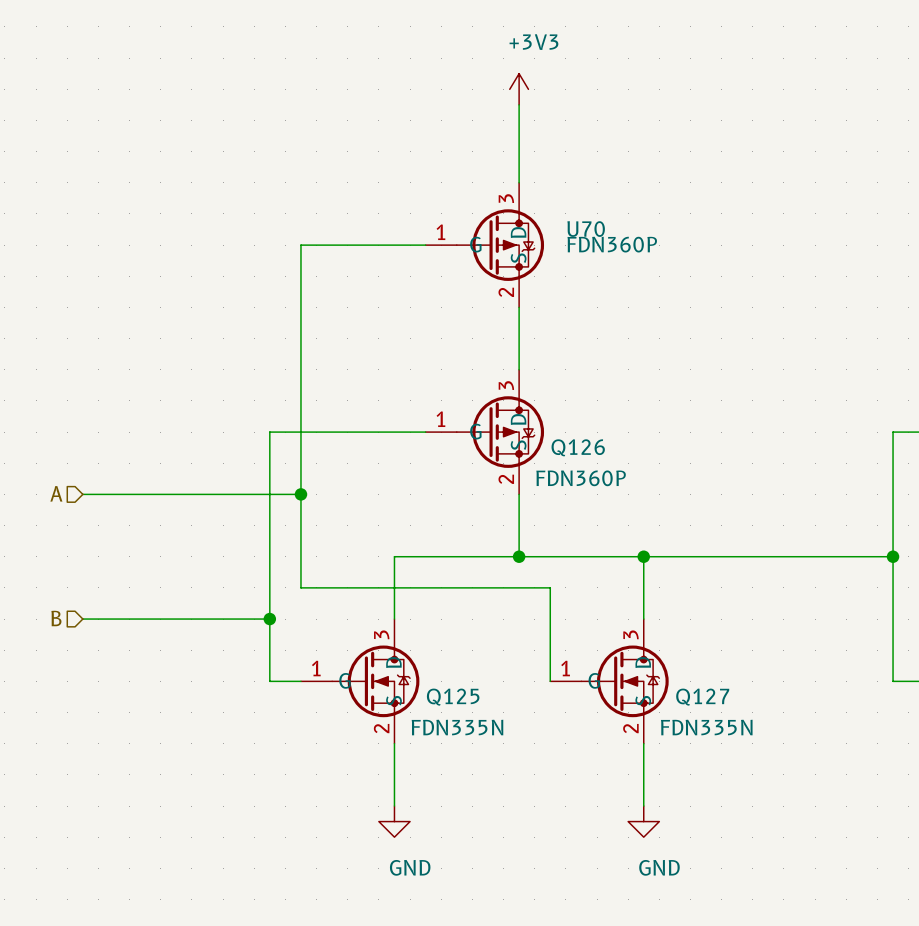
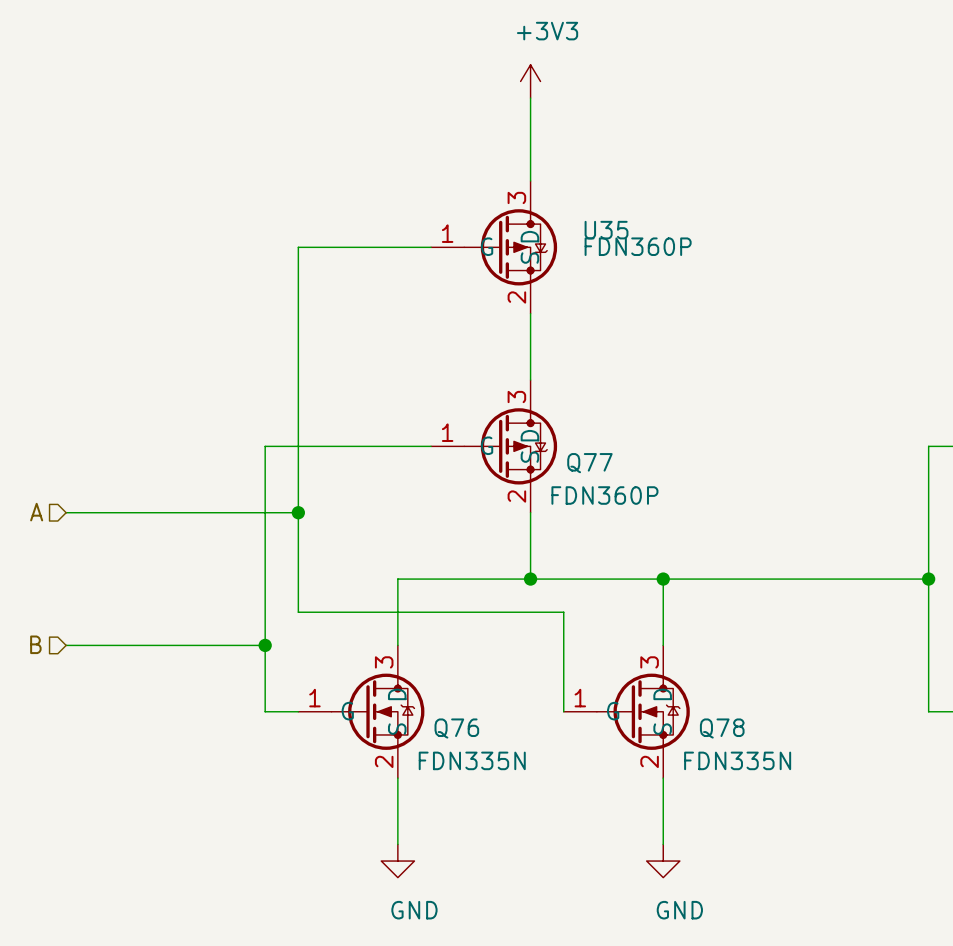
U70 name: U70 (586, 229) -> U35 (606, 230)
Q126 name: Q126 (578, 447) -> Q77 (589, 463)
Q125 name: Q125 (453, 697) -> Q76 (456, 728)
Q127 name: Q127 (702, 697) -> Q78 (722, 728)

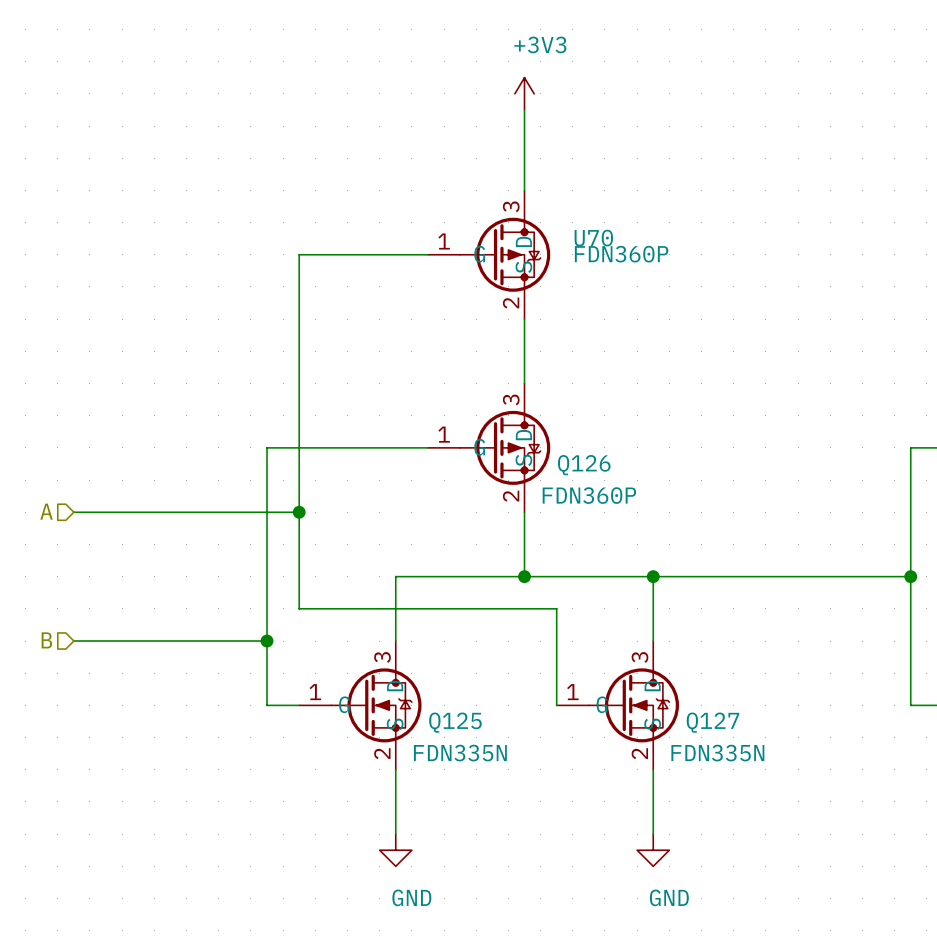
U35 name: U35 (606, 230) -> U70 (593, 238)
Q77 name: Q77 (589, 463) -> Q126 (584, 465)
Q76 name: Q76 (456, 728) -> Q125 (455, 722)
Q78 name: Q78 (722, 728) -> Q127 (712, 722)

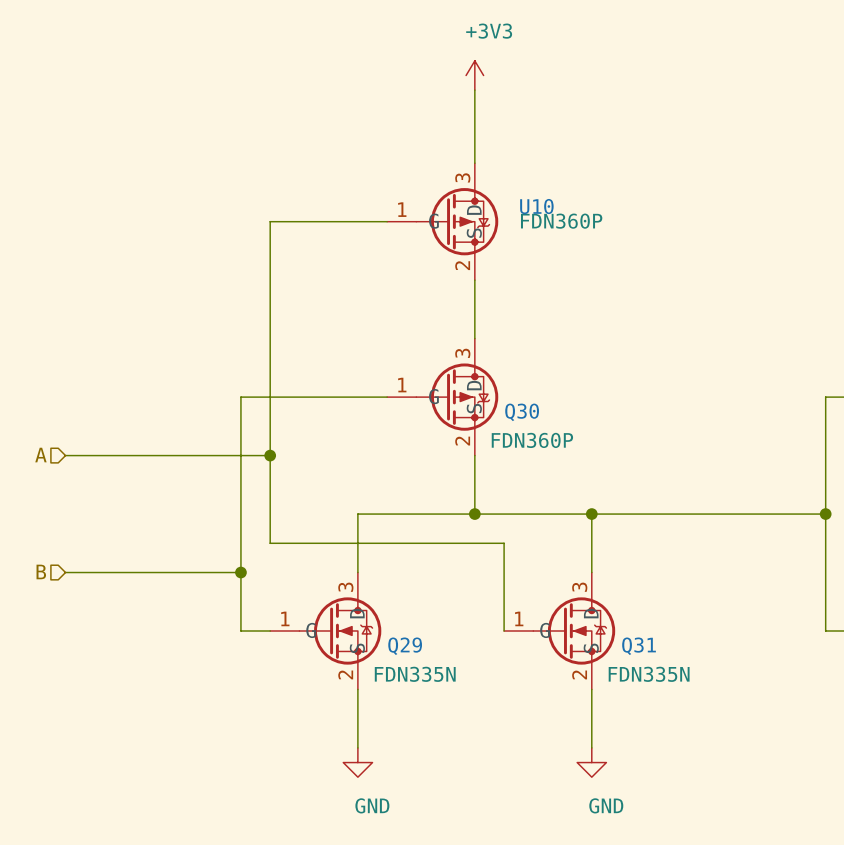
U70 name: U70 (593, 238) -> U10 (536, 206)
Q126 name: Q126 (584, 465) -> Q30 (522, 412)
Q125 name: Q125 (455, 722) -> Q29 (405, 646)
Q127 name: Q127 (712, 722) -> Q31 (639, 646)

